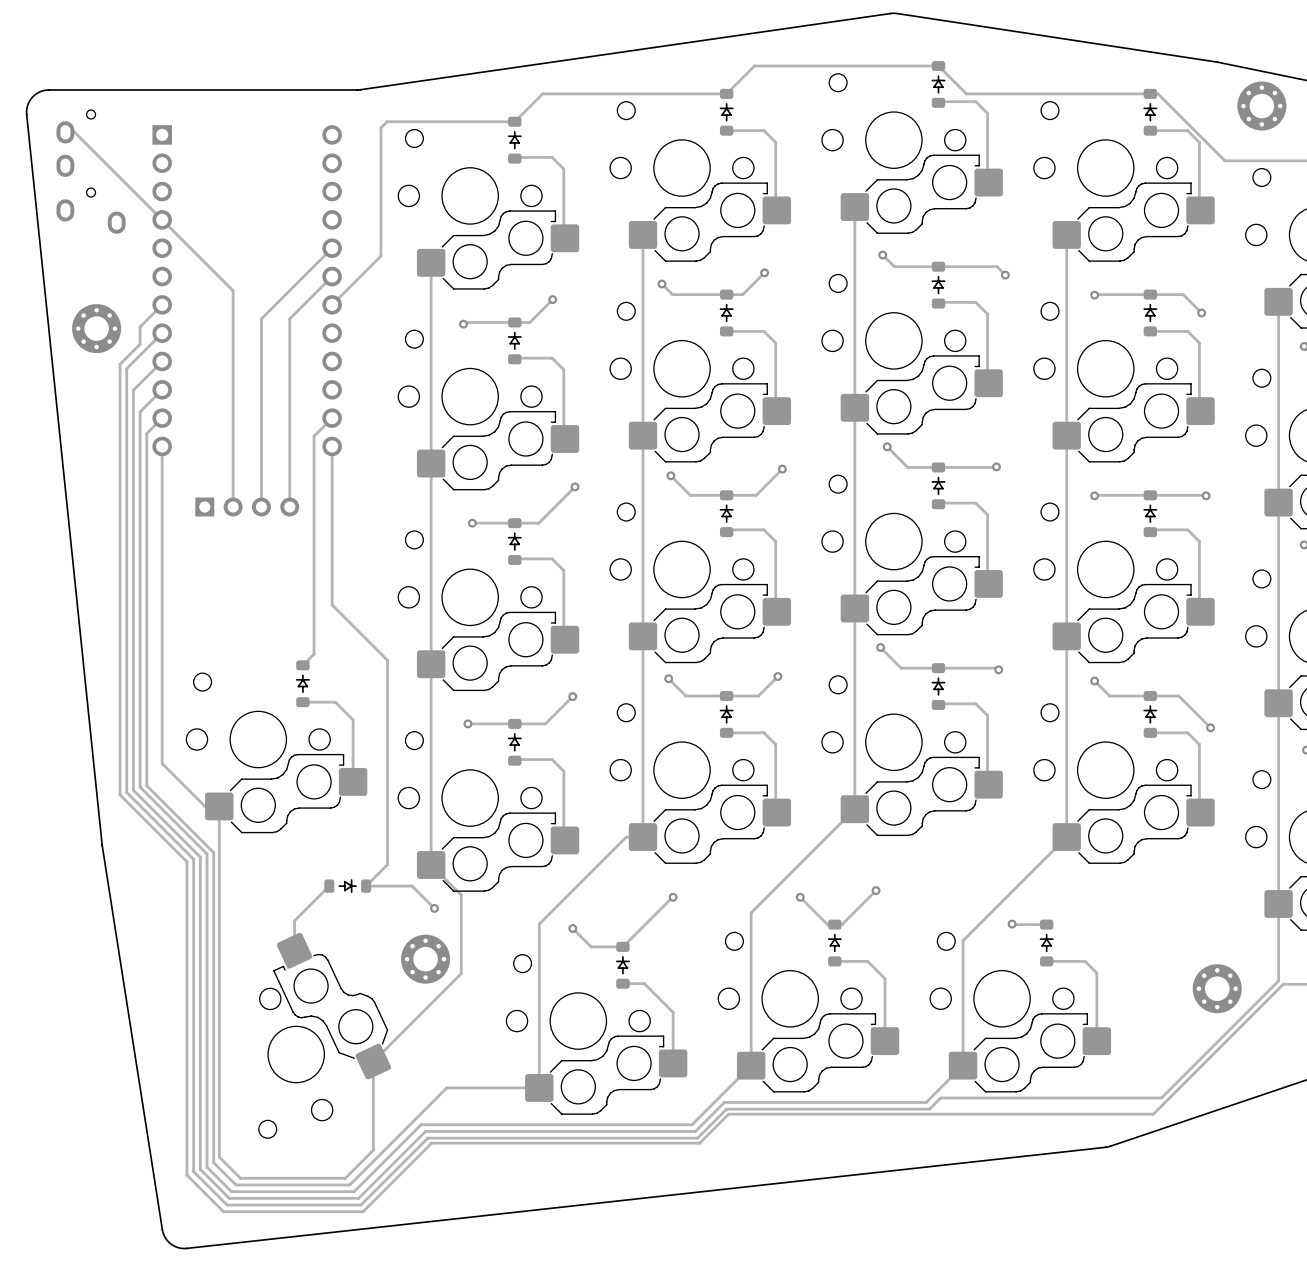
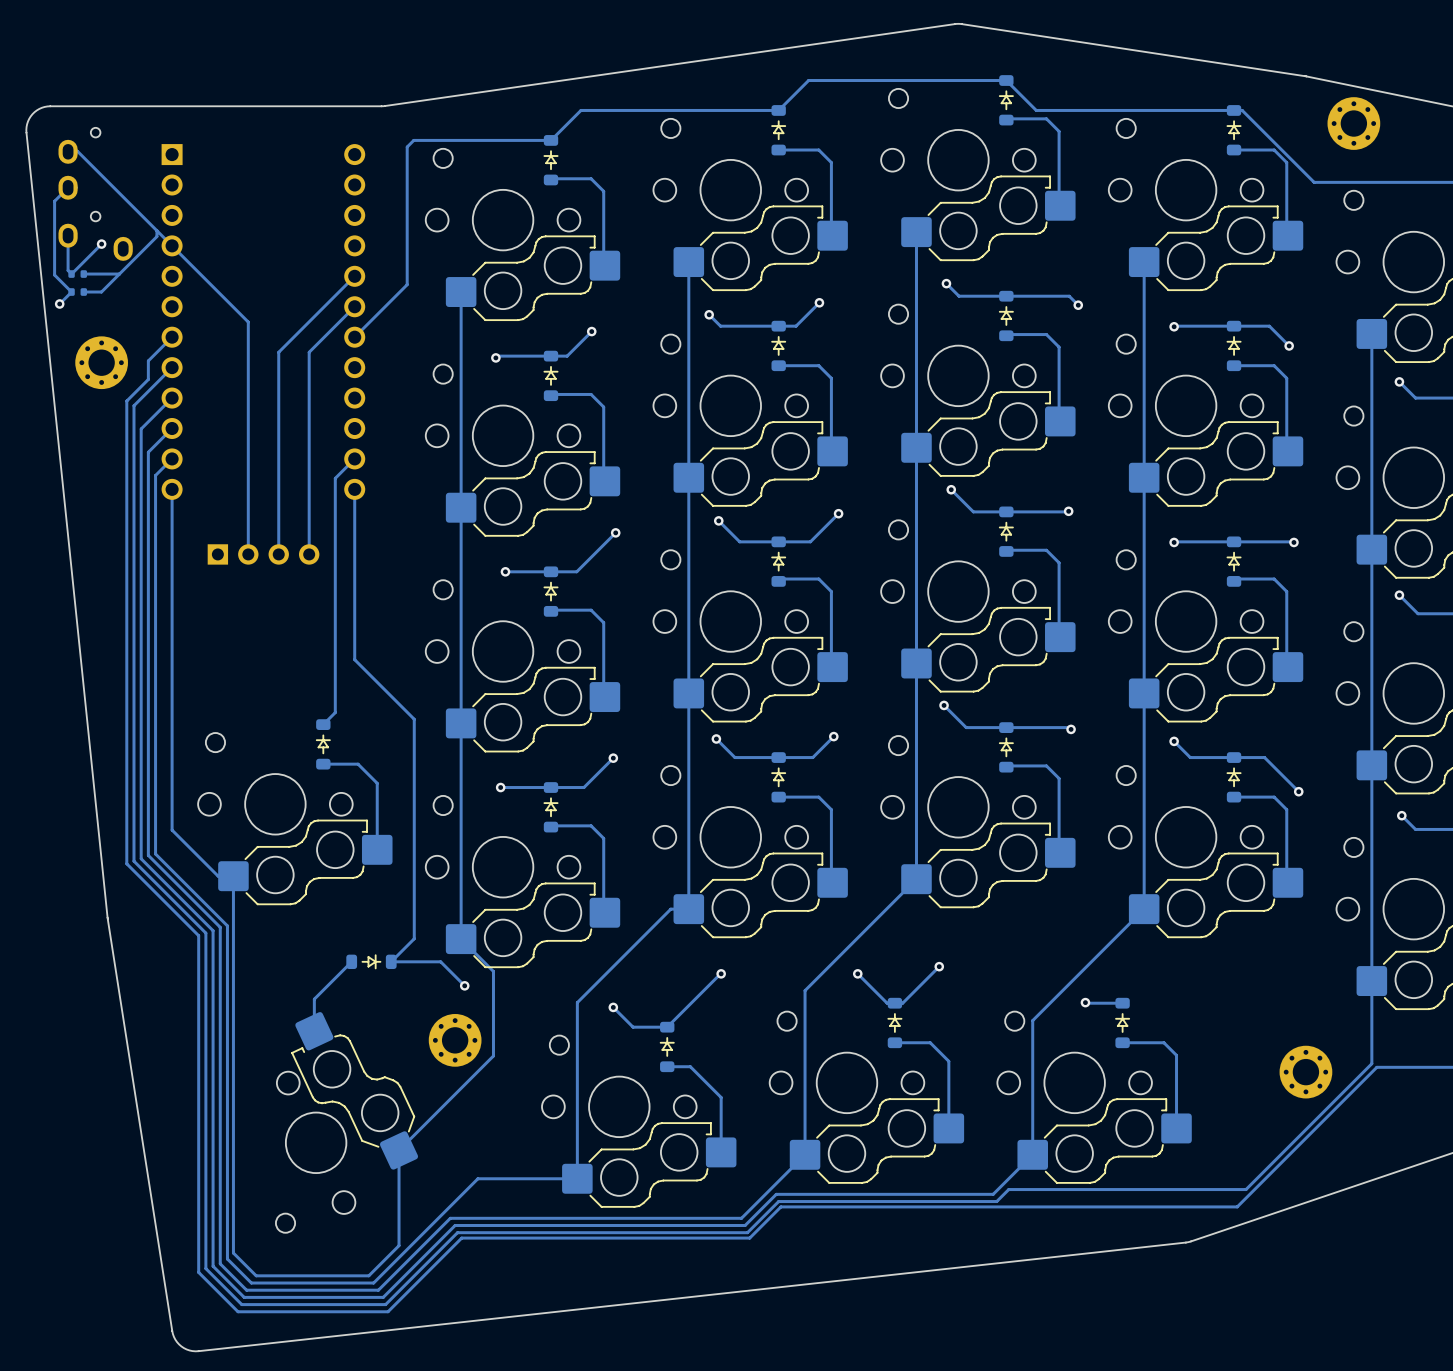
track: none -> (68, 187) (54, 201) (54, 275) (71, 292)
track: none -> (156, 230) (156, 236) (101, 292) (83, 292)
track: none -> (68, 235) (68, 270) (71, 274)
track: none -> (101, 244) (71, 274)
via: none -> (101, 244)
part: none -> (77, 274)
track: none -> (119, 274) (83, 274)
track: none -> (71, 292) (59, 303)
part: none -> (77, 292)
via: none -> (59, 303)

